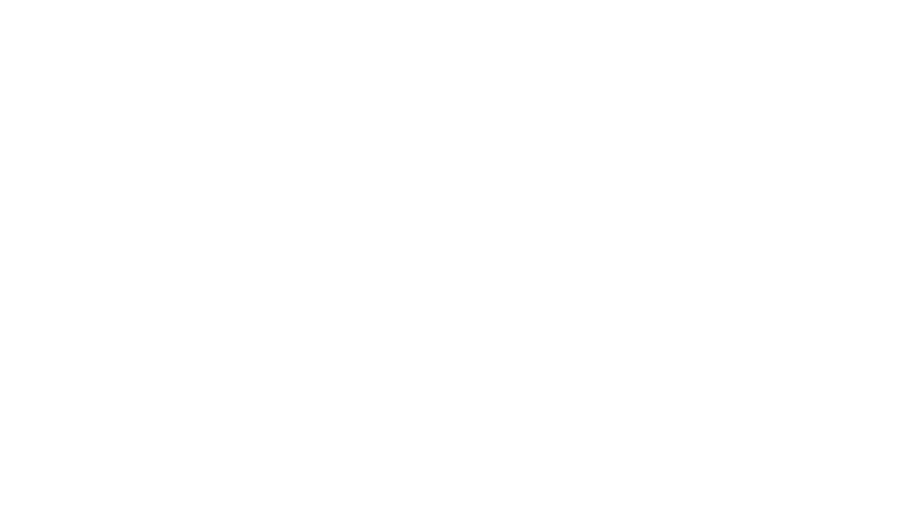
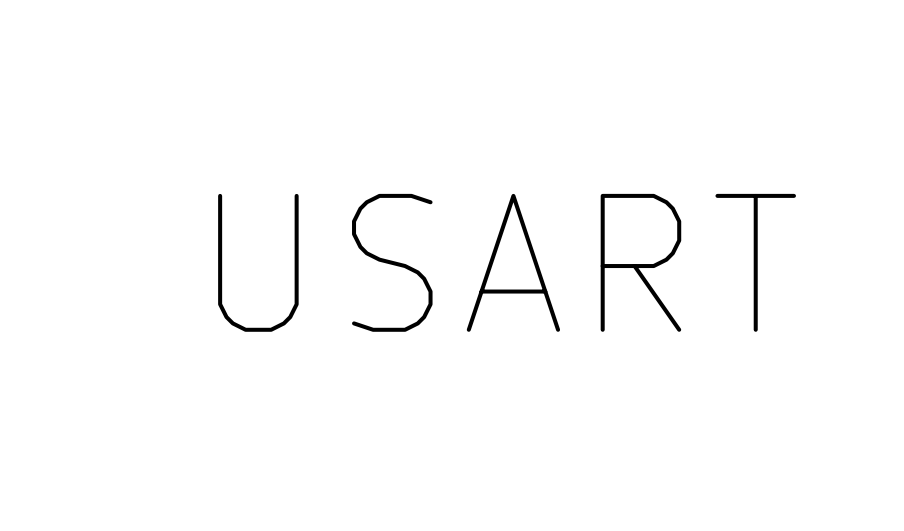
text: none -> USART (507, 262)

